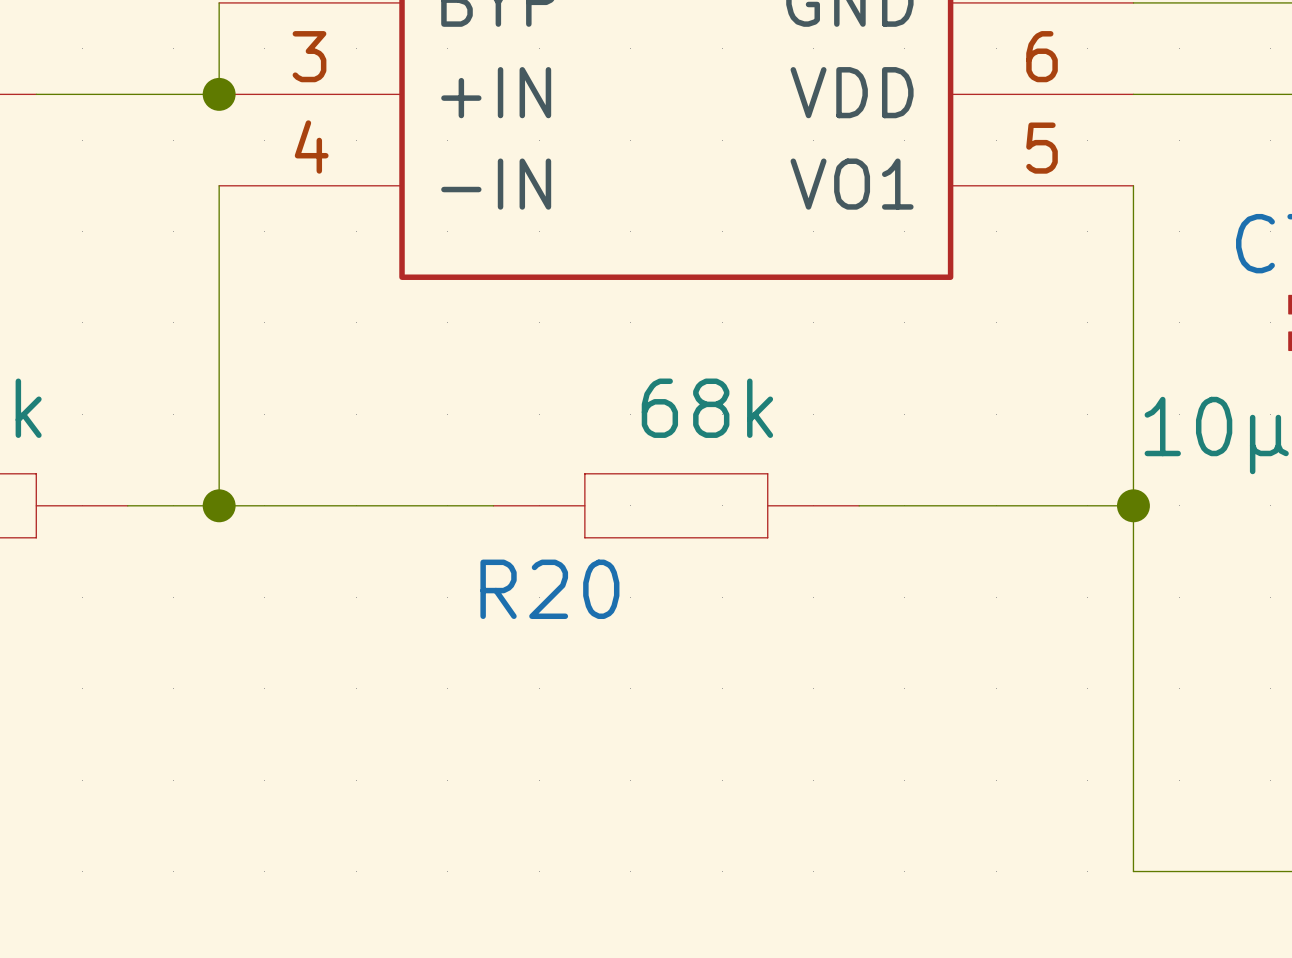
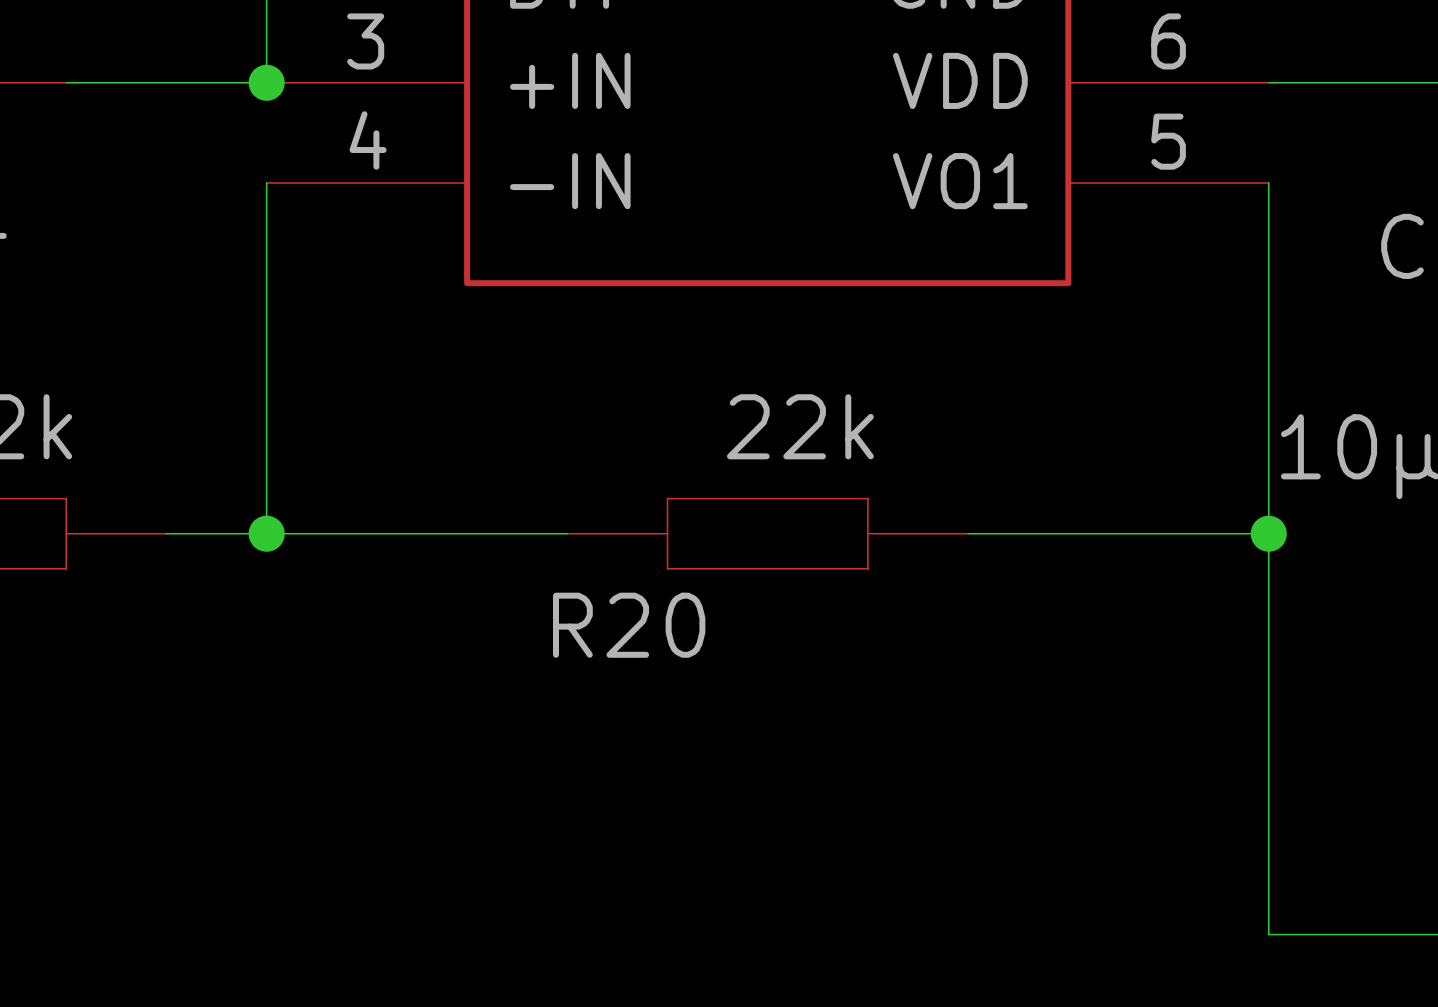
R20 value: 68k (707, 408) -> 22k (800, 426)

